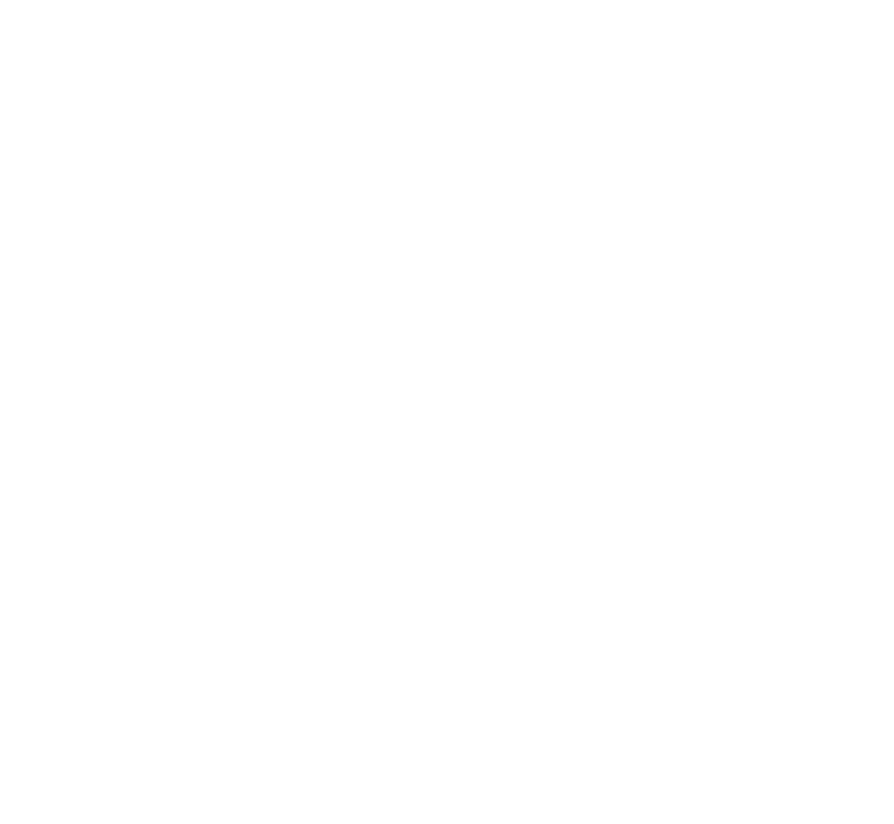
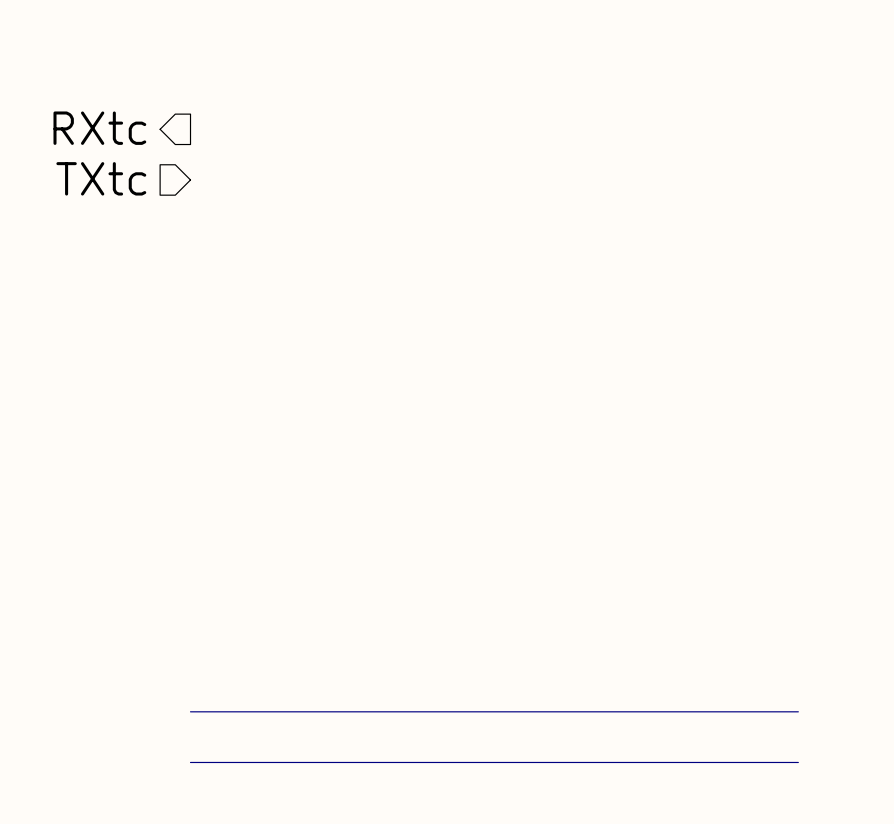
sheet pin: none -> RXtc (99, 128)
sheet pin: none -> TXtc (101, 178)
wire: none -> (190, 711) (798, 711)
wire: none -> (190, 762) (798, 762)

